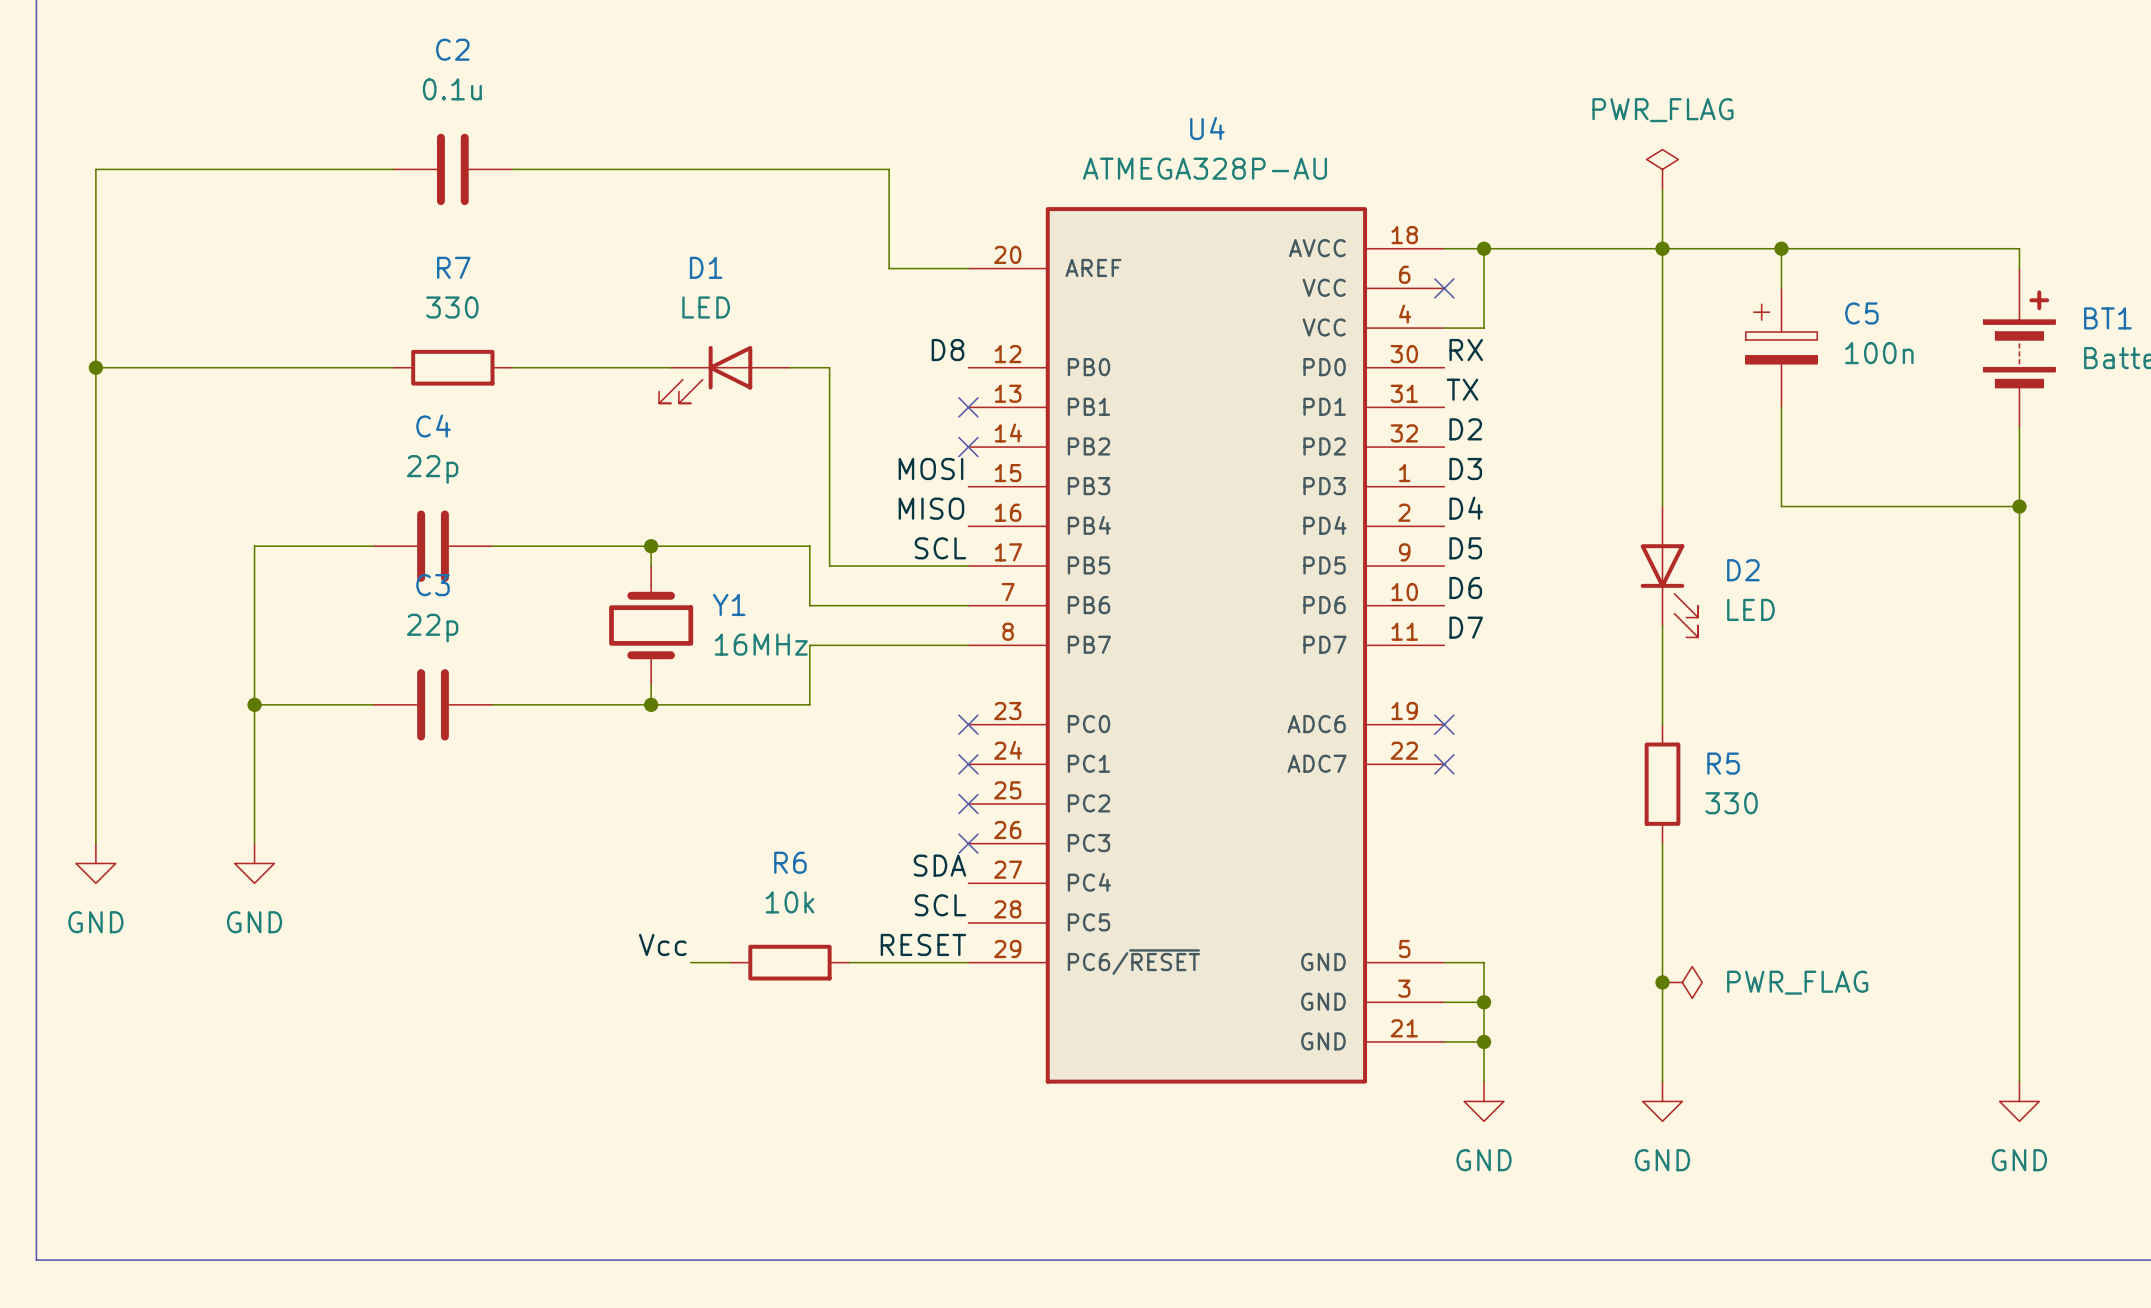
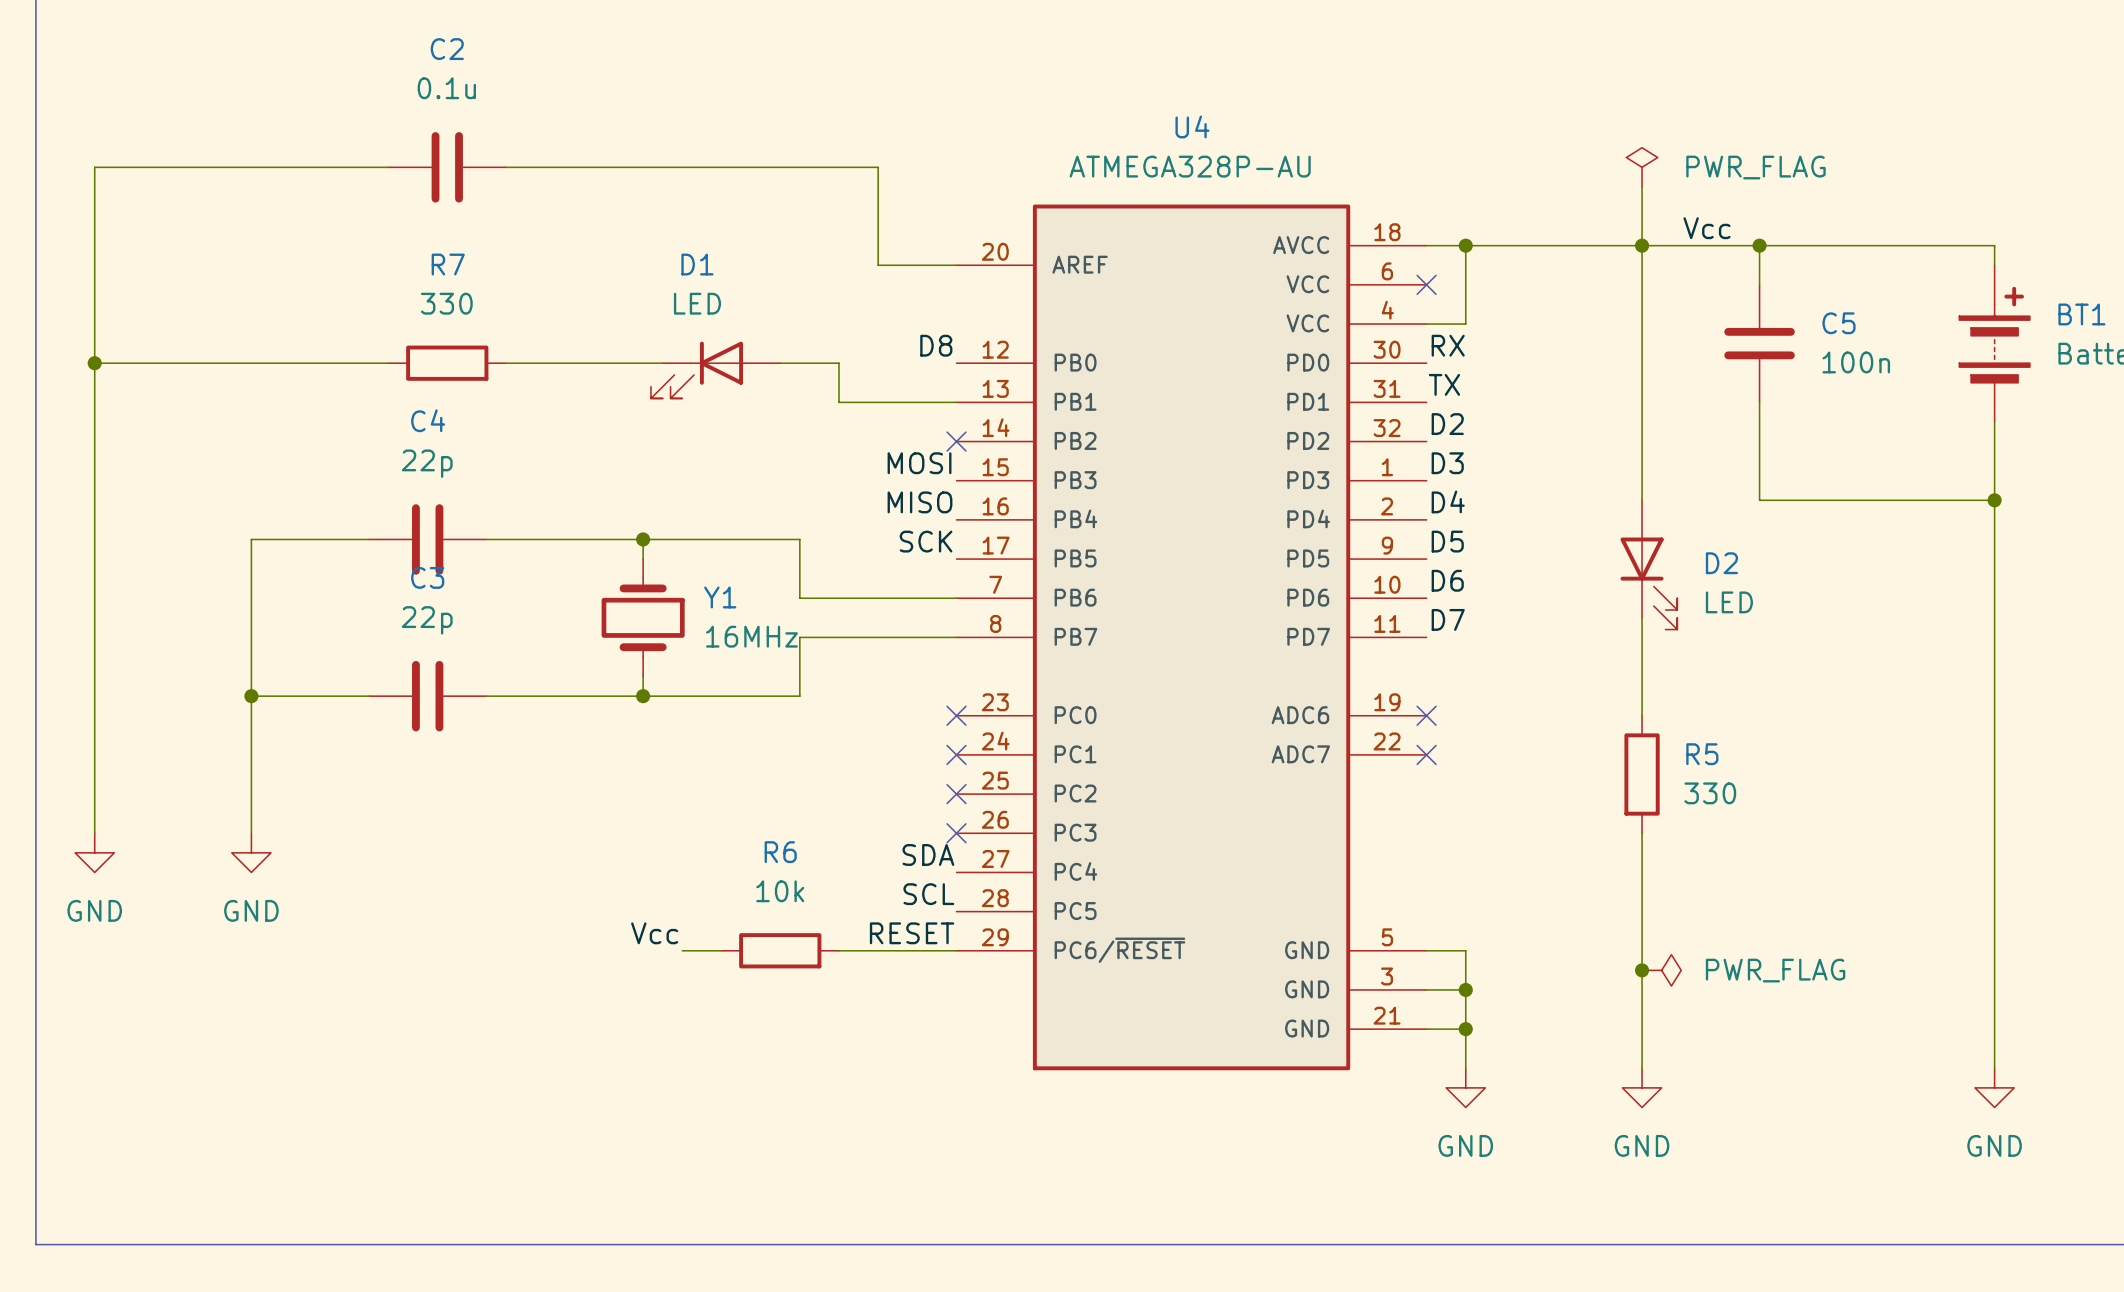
power symbol text position: PWR_FLAG (1662, 110) -> PWR_FLAG (1755, 167)
label: none -> Vcc (1707, 228)
C5 symbol: [1745, 288, 1818, 408] -> [1724, 284, 1795, 403]
wire: (829, 367) (829, 566) (968, 566) -> (819, 363) (839, 363) (839, 402) (956, 402)
no-connect mark: (968, 407) -> none
label: SCL (940, 548) -> SCK (926, 541)

